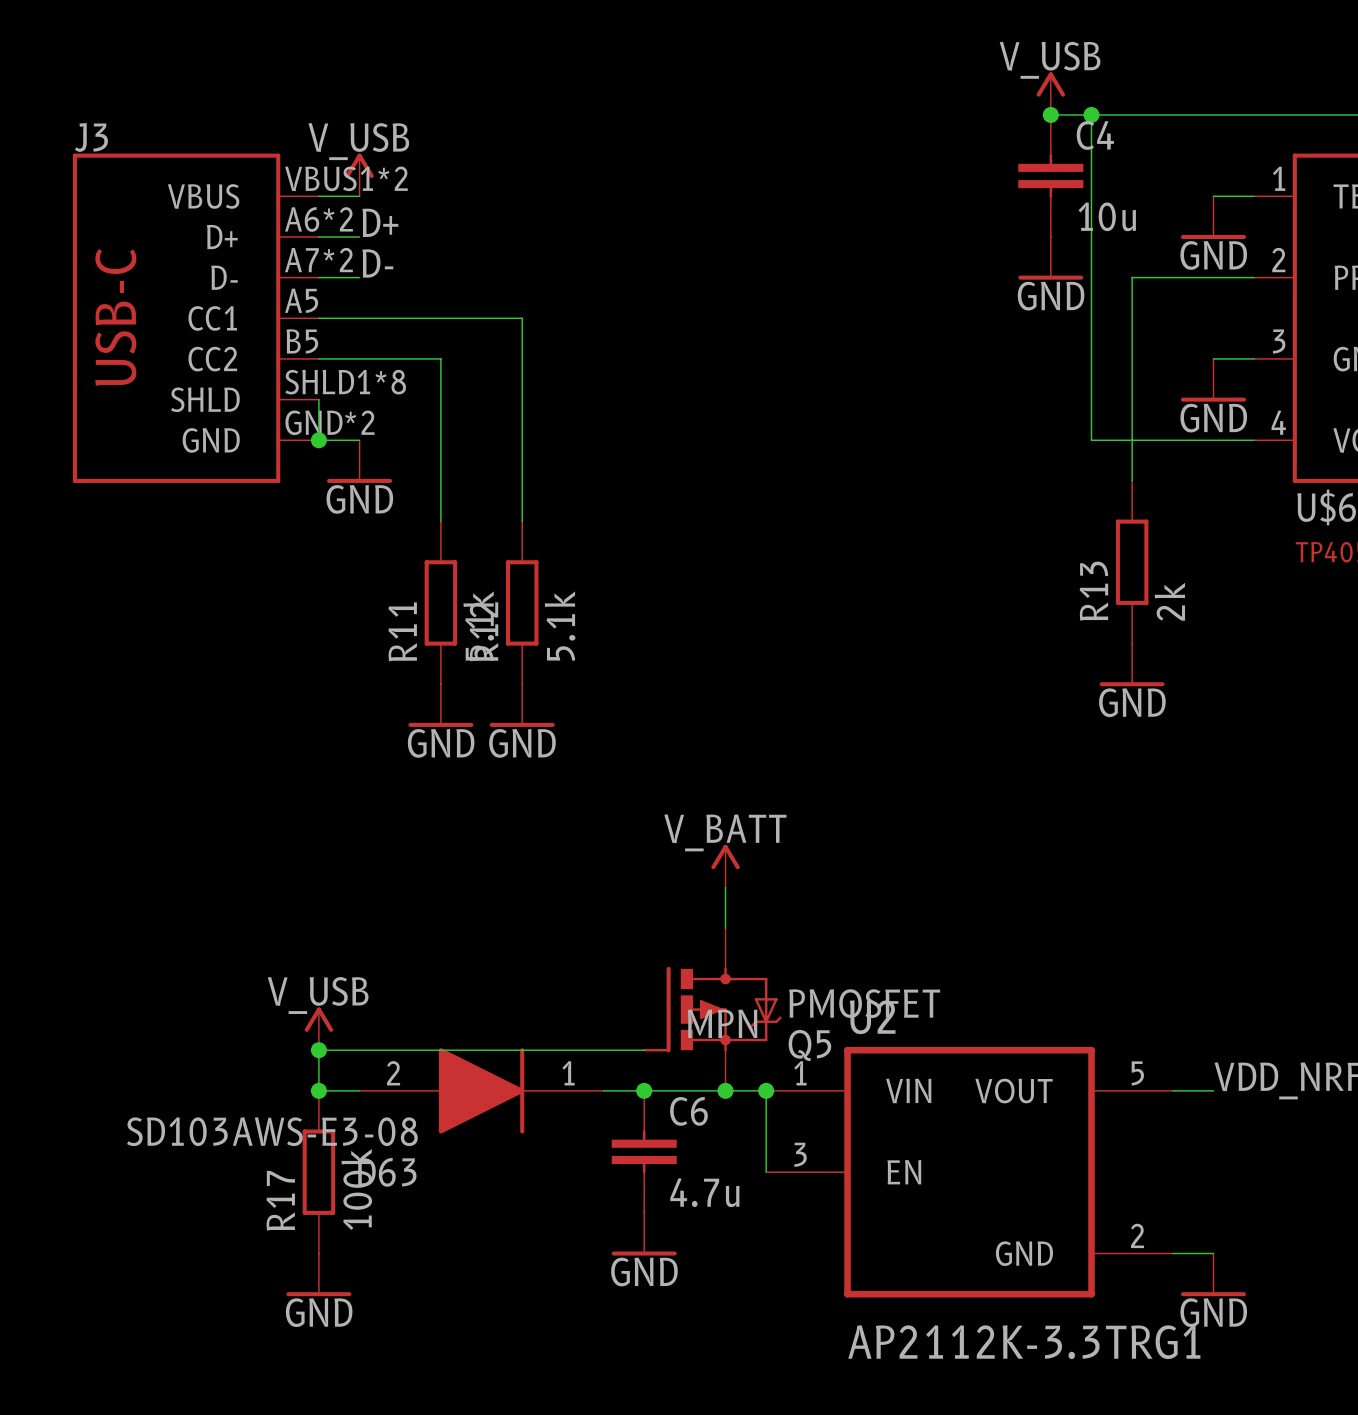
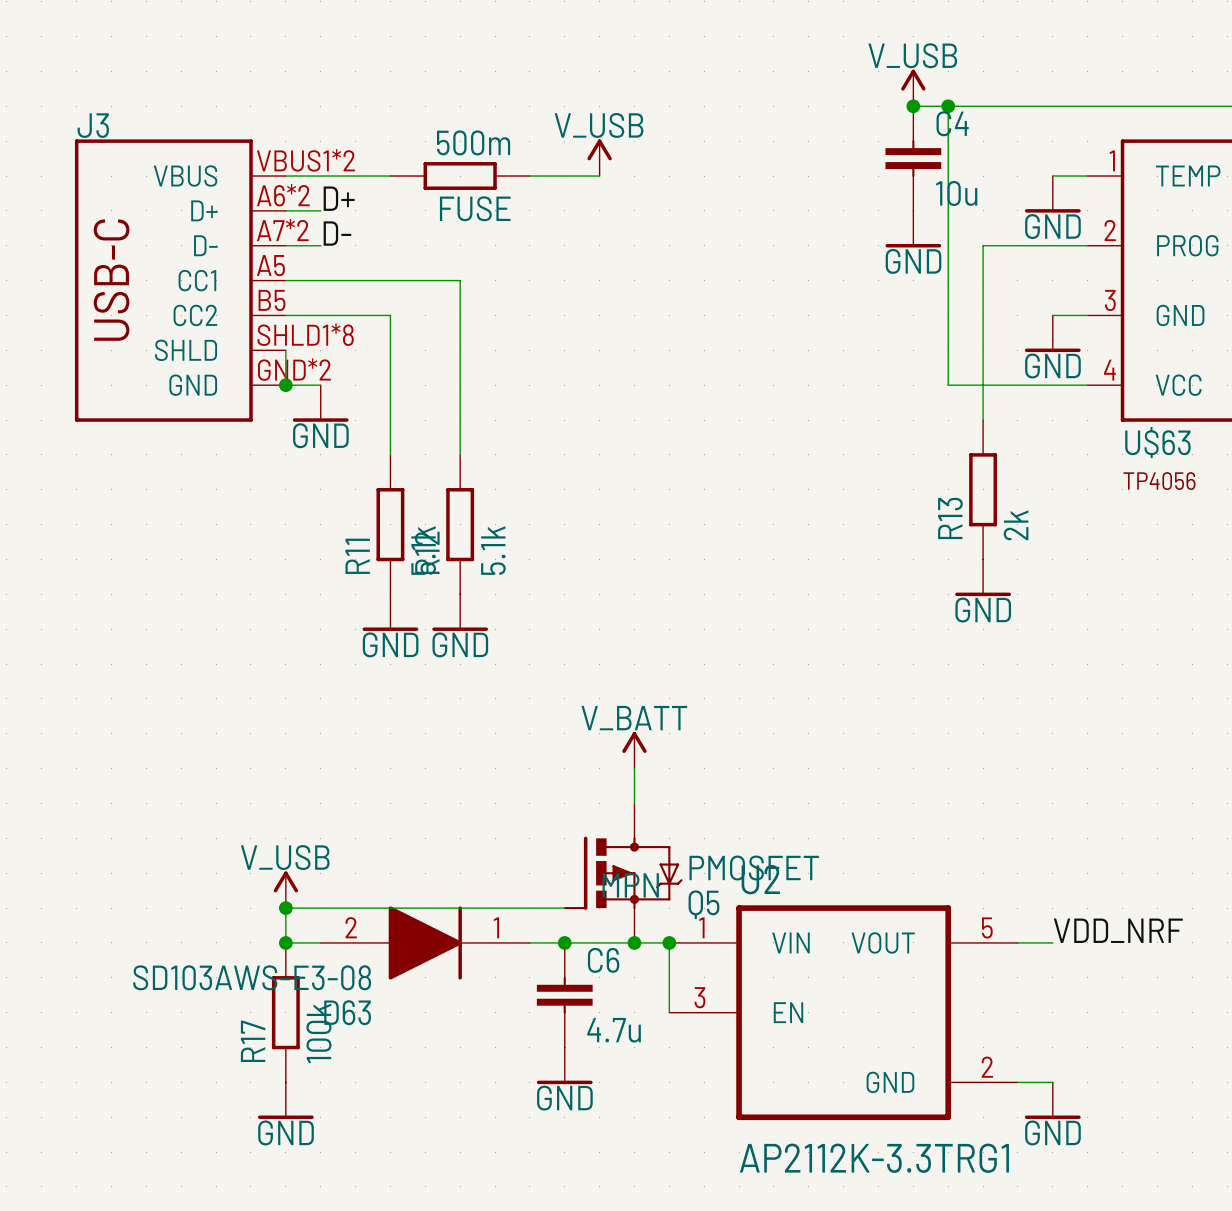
power symbol position: V_USB (359, 174) -> V_USB (599, 157)
wire: none -> (320, 176) (390, 176)
FUSE: none -> 500m (460, 176)
wire: none -> (529, 176) (599, 176)

